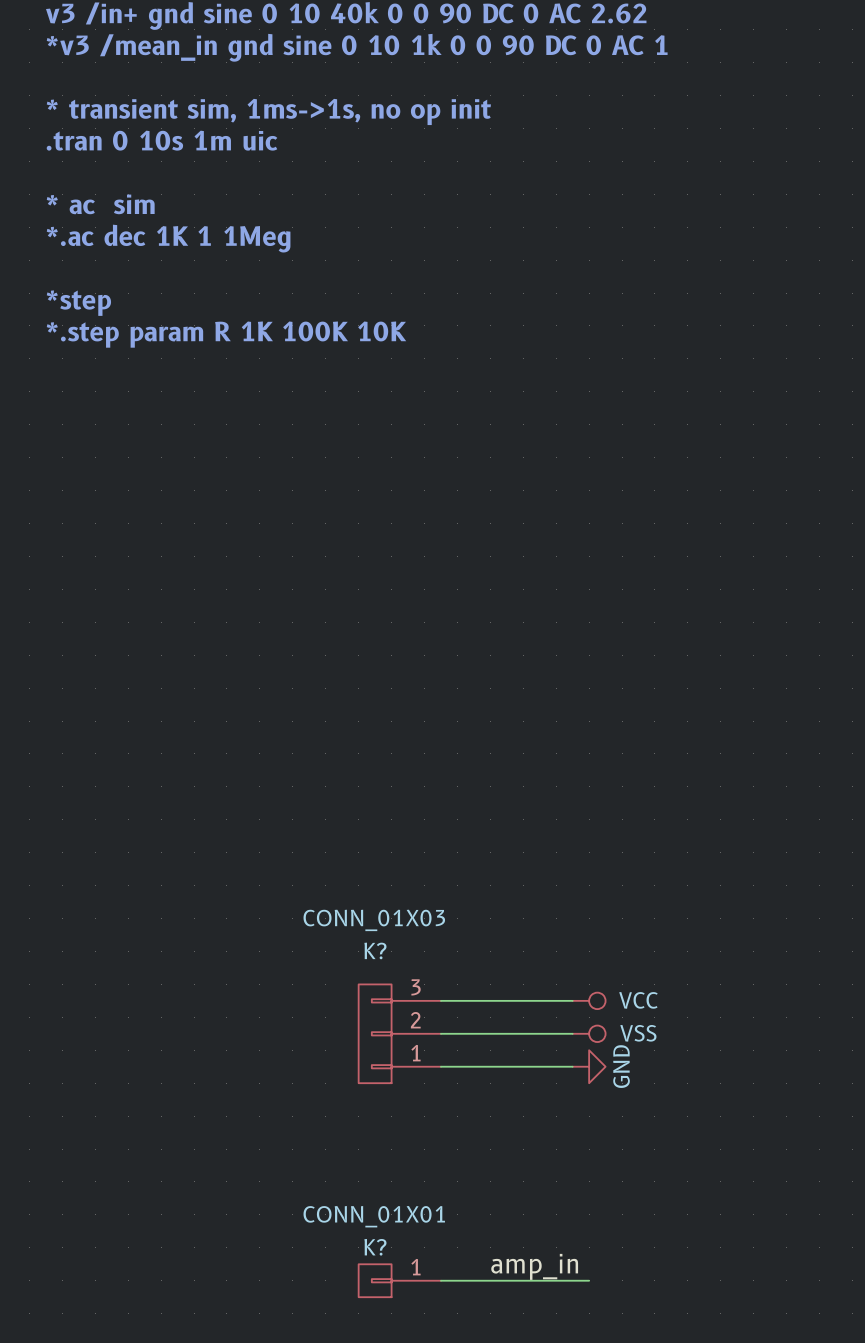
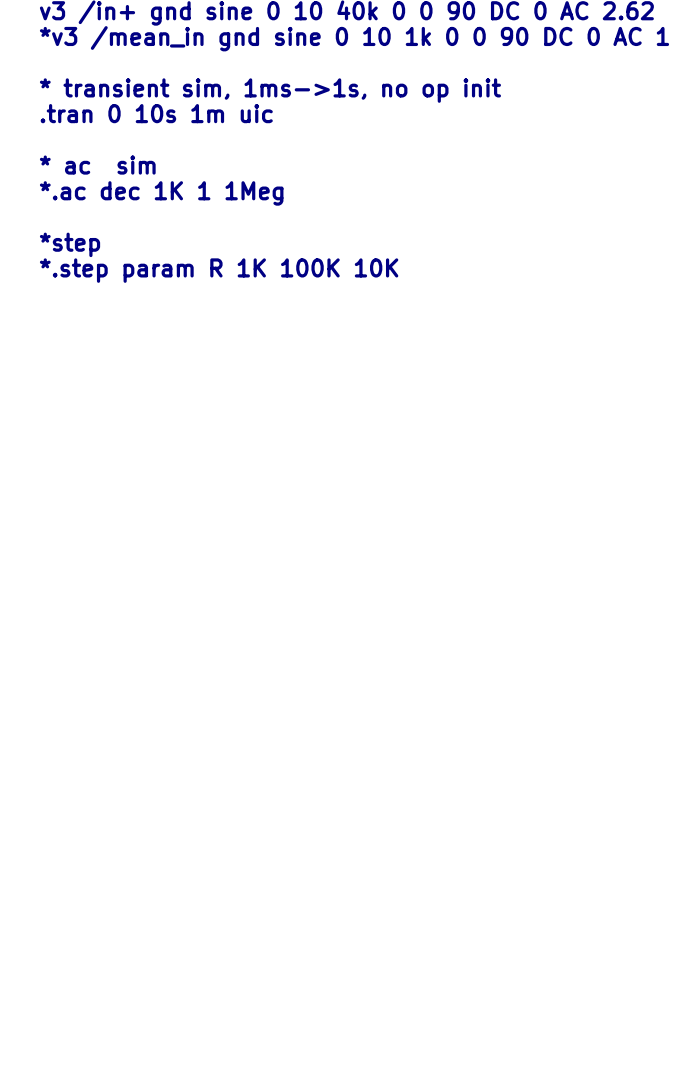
wire: (440, 1000) (572, 1000) -> none
power symbol: VCC (589, 1000) -> none
K?: CONN_01X03 (399, 1033) -> none
wire: (440, 1033) (572, 1033) -> none
power symbol: VSS (589, 1033) -> none
wire: (440, 1066) (572, 1066) -> none
power symbol: GND (589, 1066) -> none
label: amp_in (534, 1266) -> none
K?: CONN_01X01 (399, 1280) -> none
wire: (440, 1280) (589, 1280) -> none

